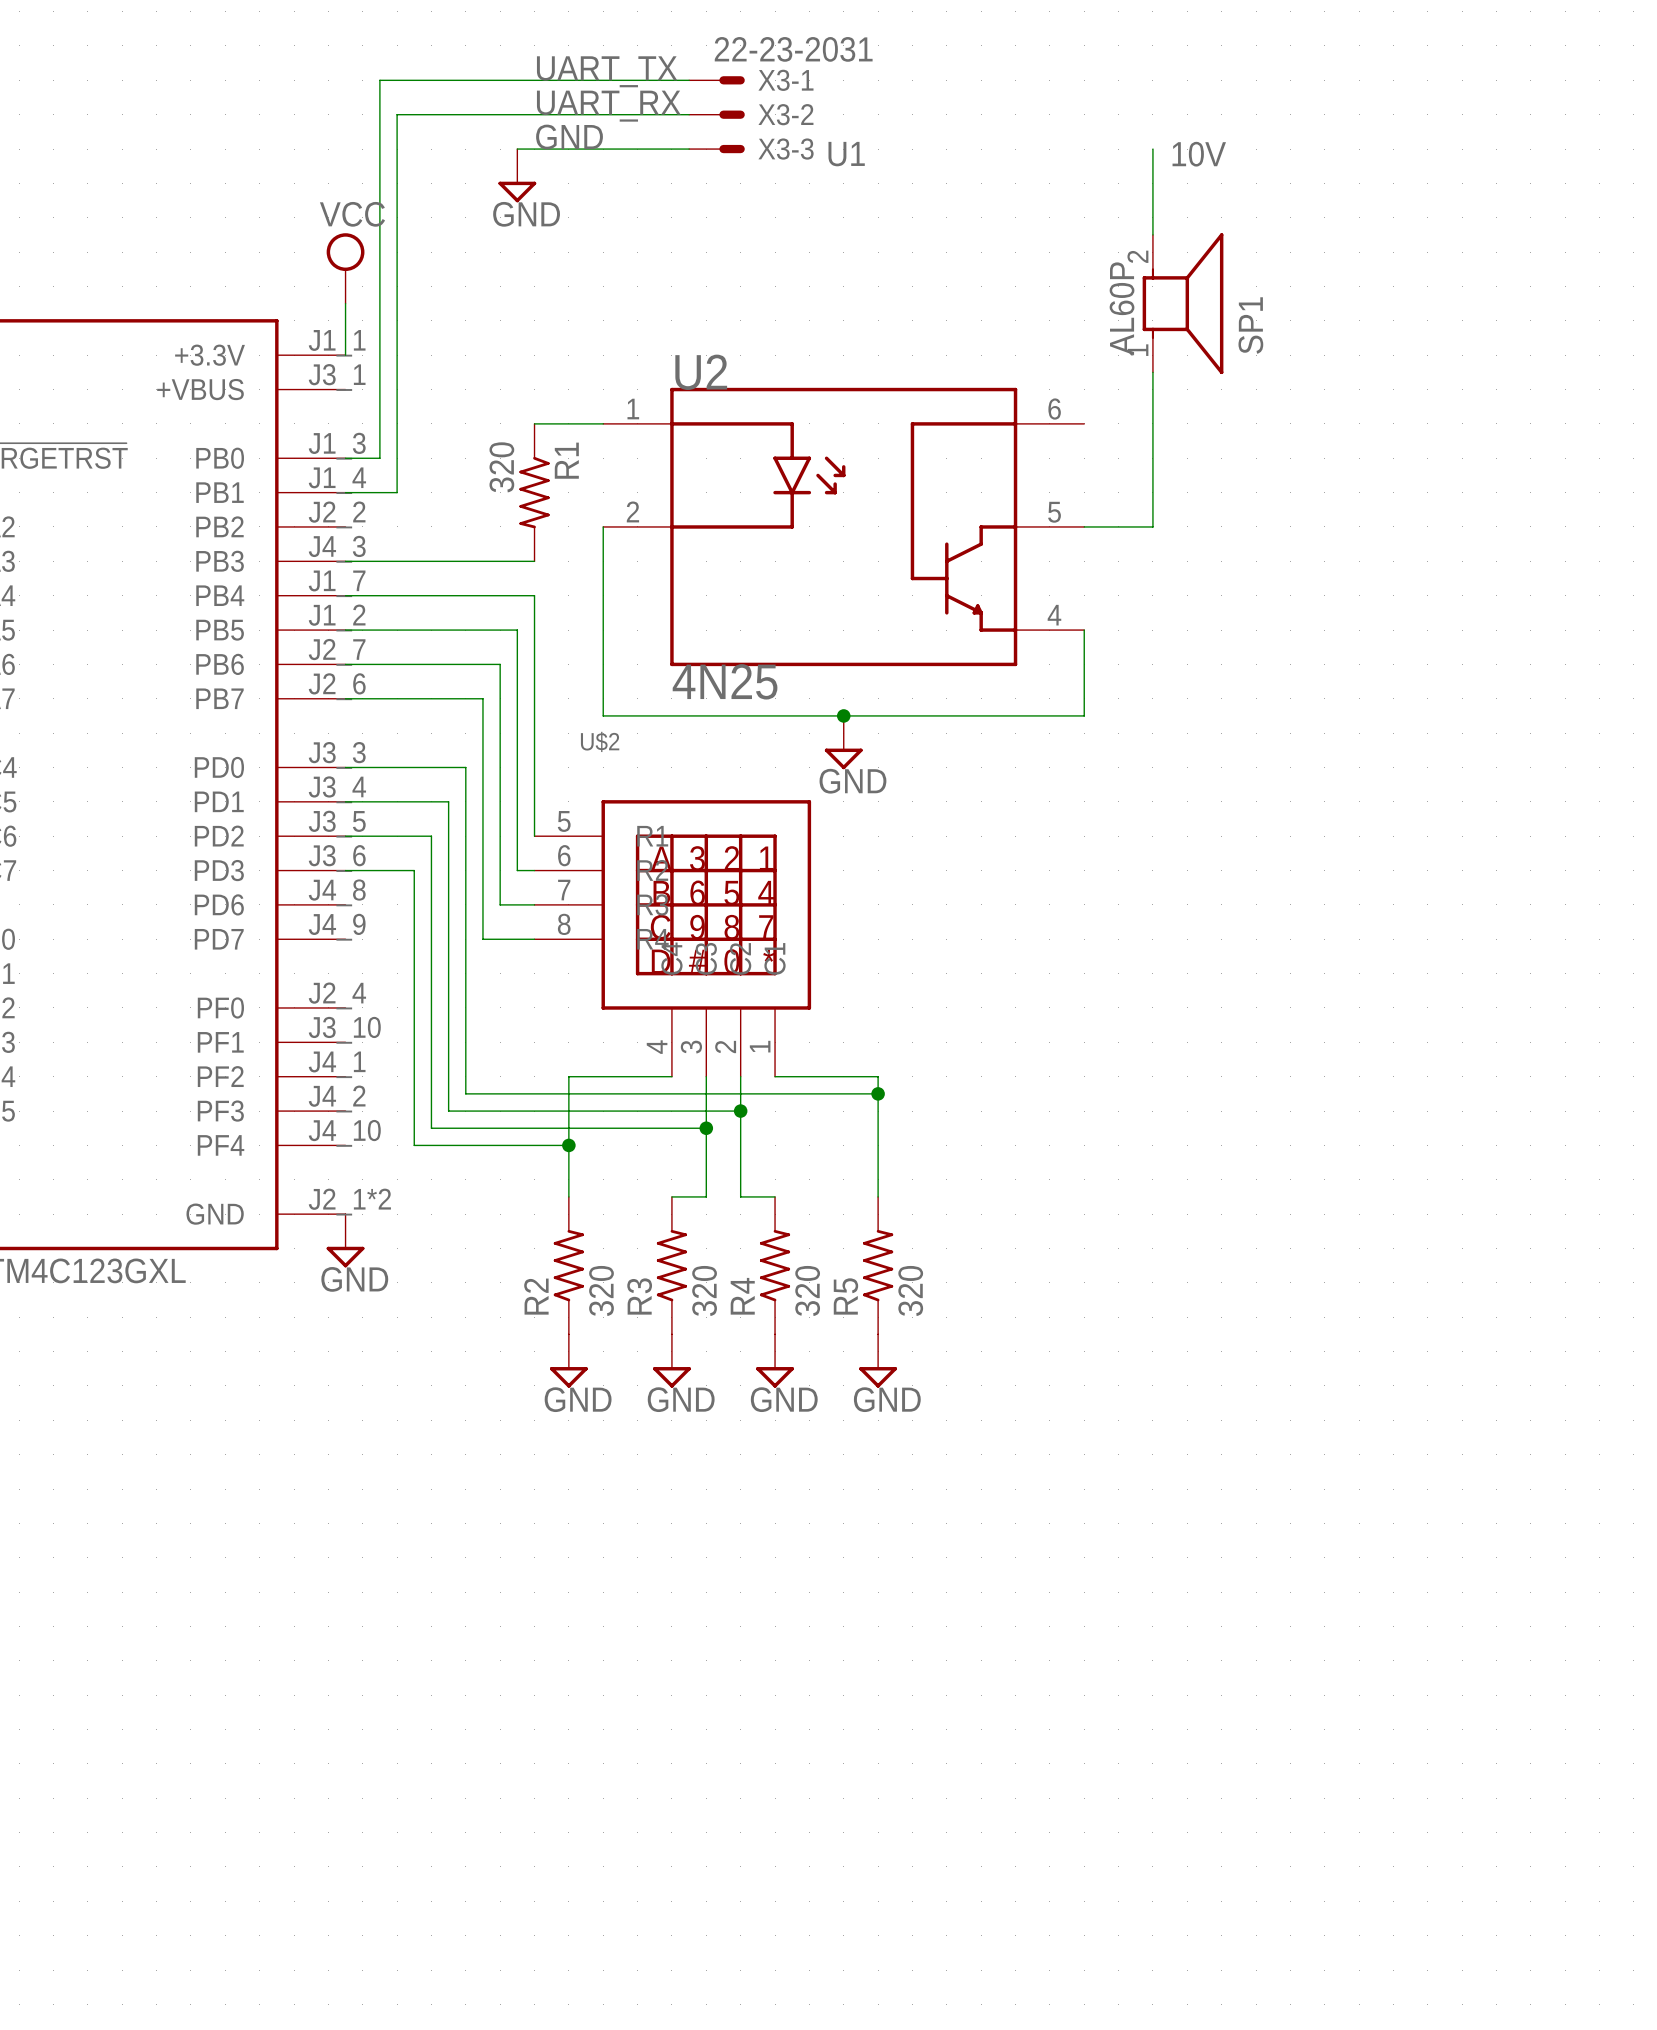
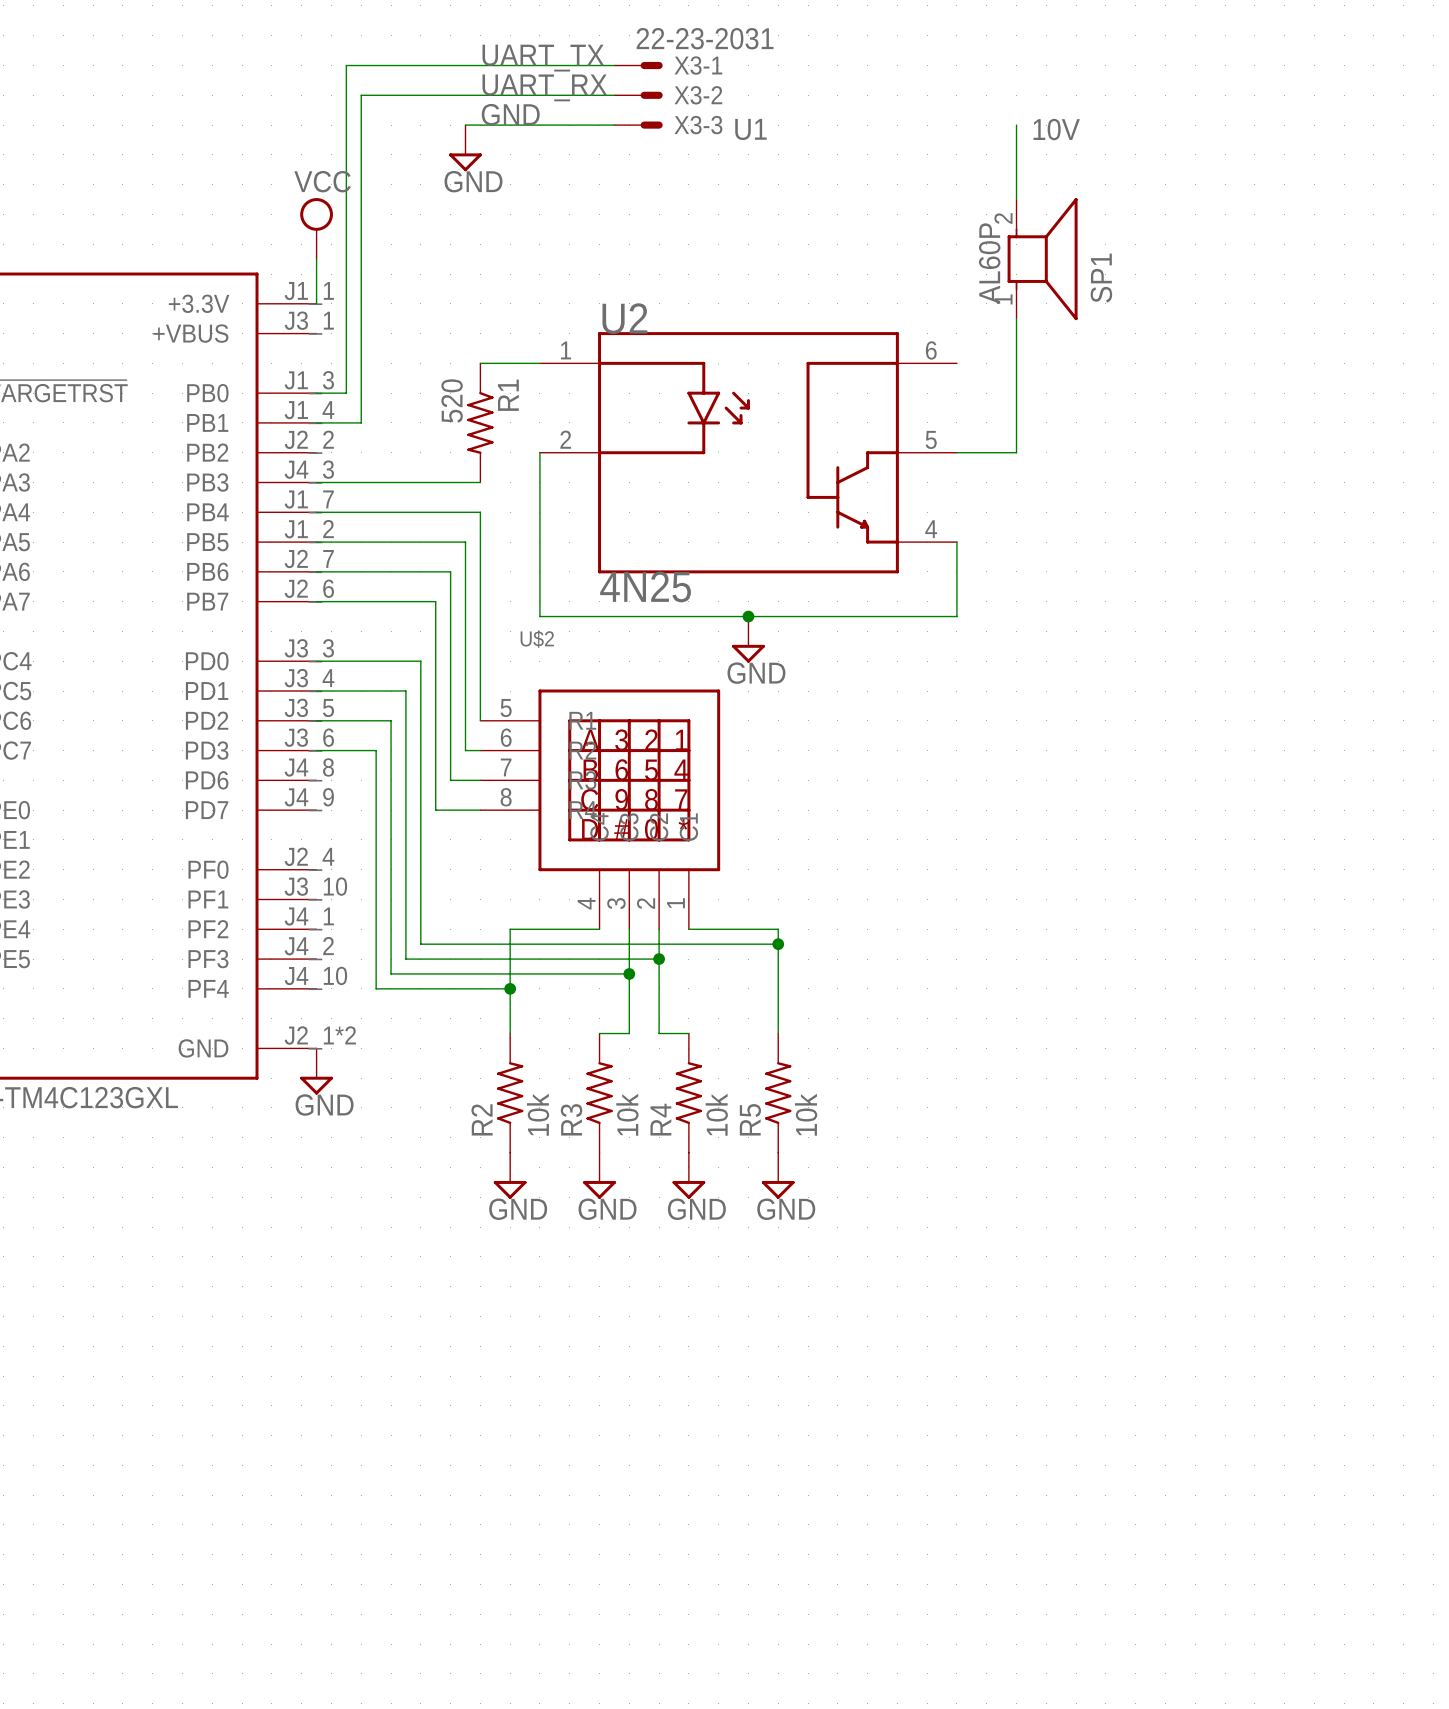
R1 value: 320 (501, 467) -> 520 (452, 401)
R2 value: 320 (601, 1290) -> 10k (538, 1114)
R3 value: 320 (704, 1290) -> 10k (627, 1114)
R4 value: 320 (807, 1290) -> 10k (716, 1114)
R5 value: 320 (910, 1290) -> 10k (806, 1114)

